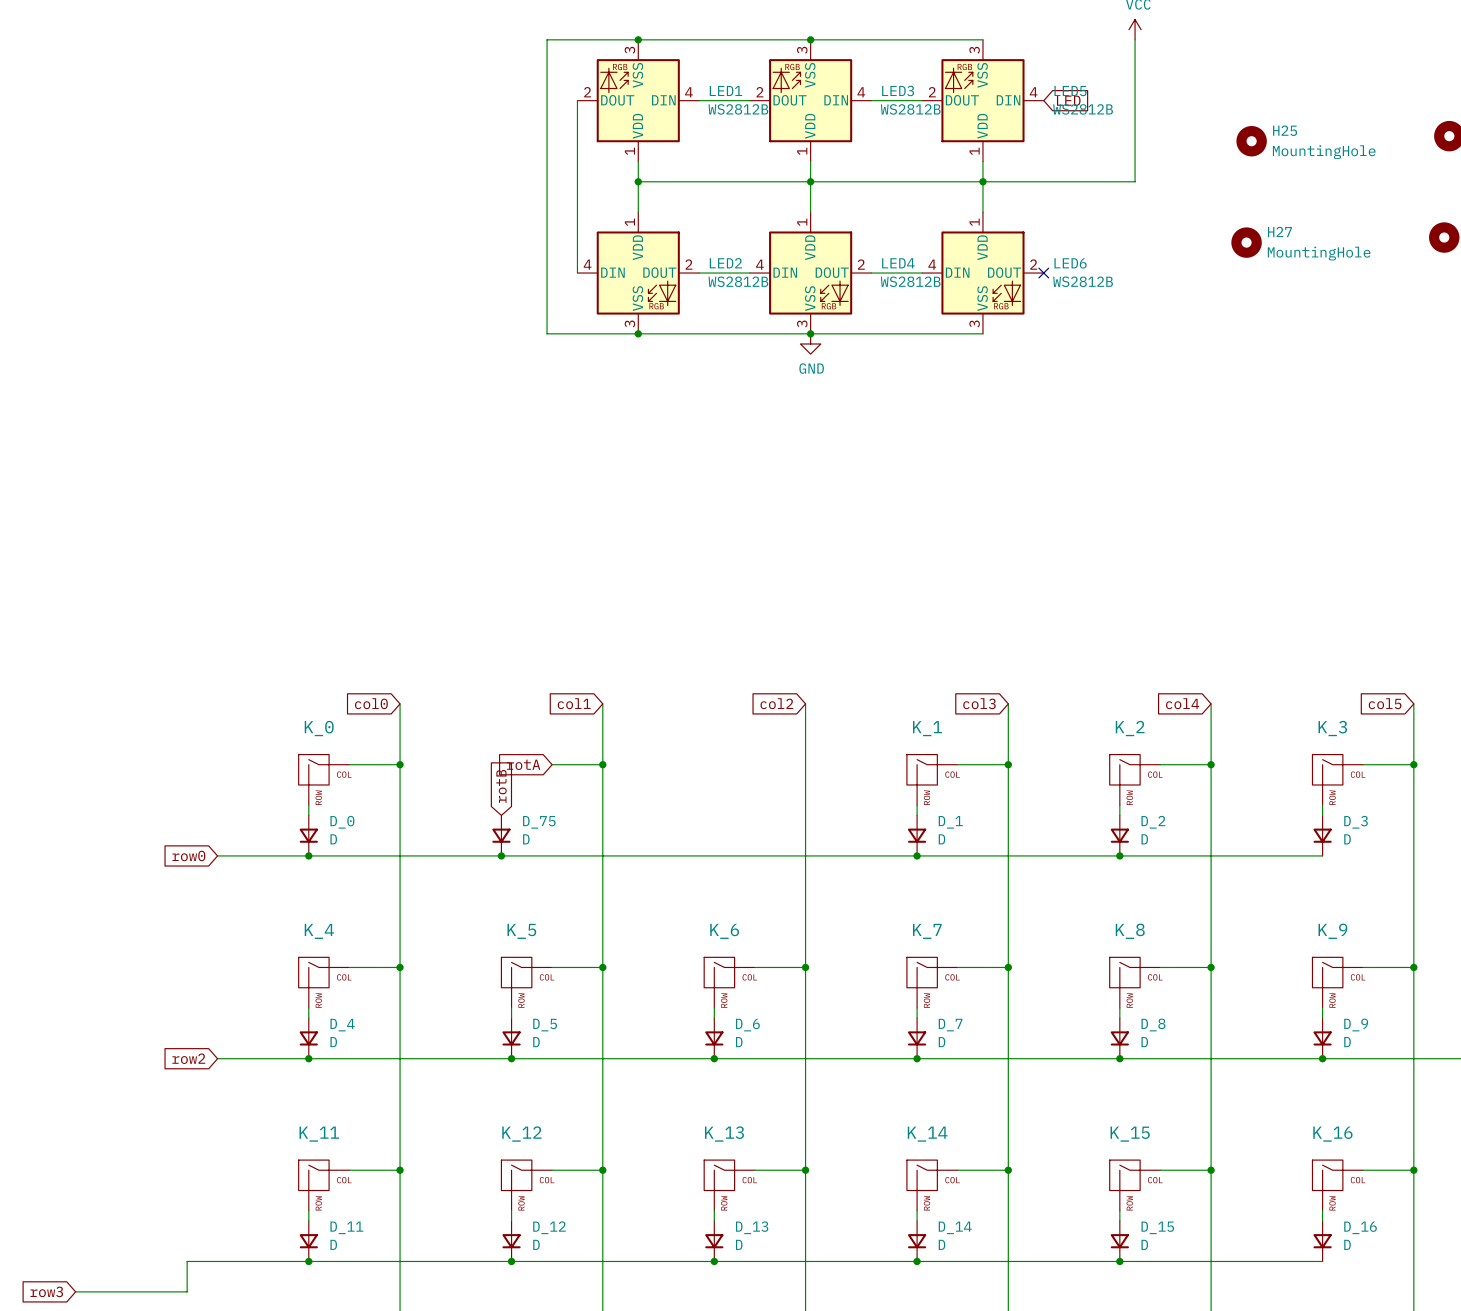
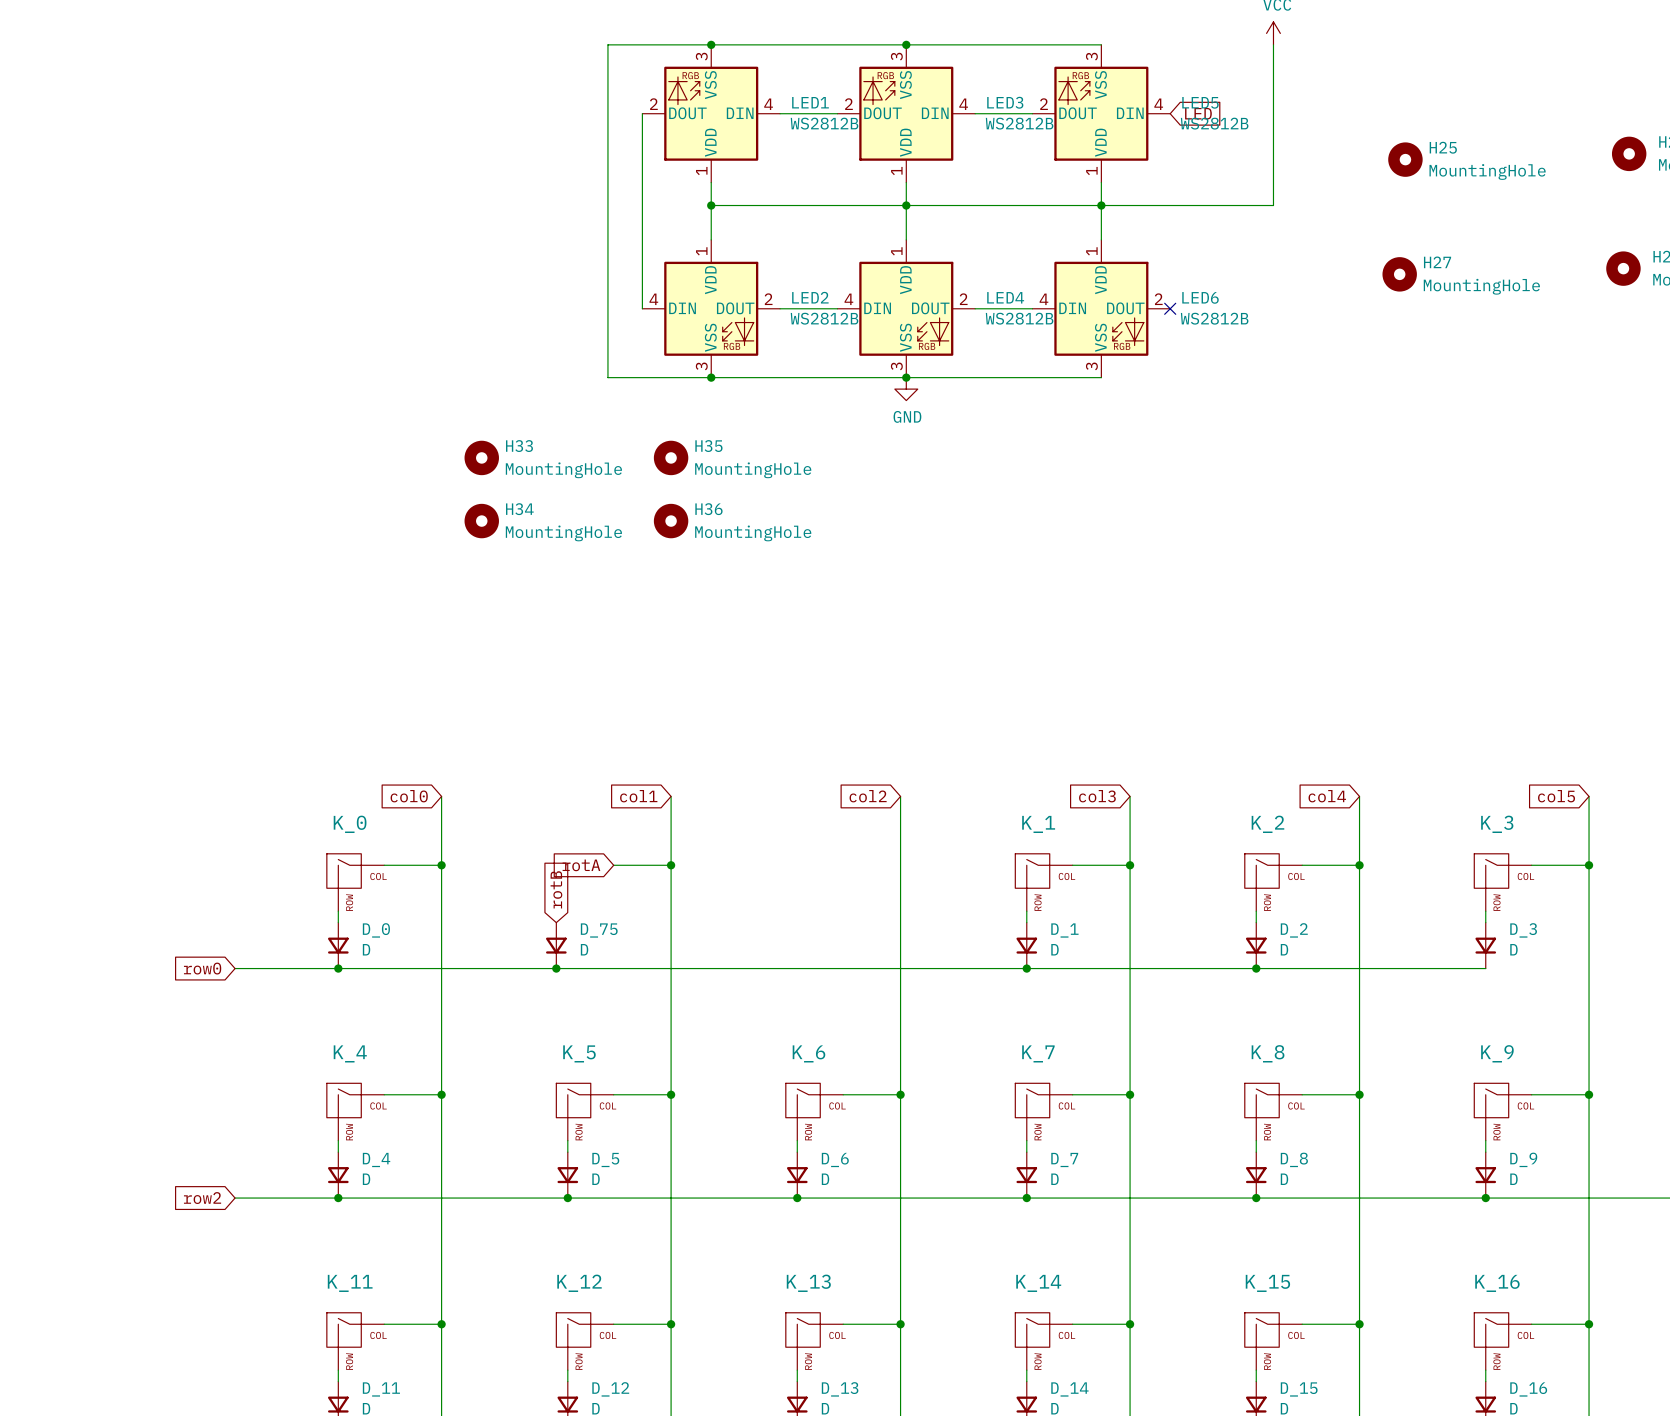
H33: none -> MountingHole (481, 457)
H35: none -> MountingHole (671, 457)
H34: none -> MountingHole (481, 521)
H36: none -> MountingHole (671, 521)

